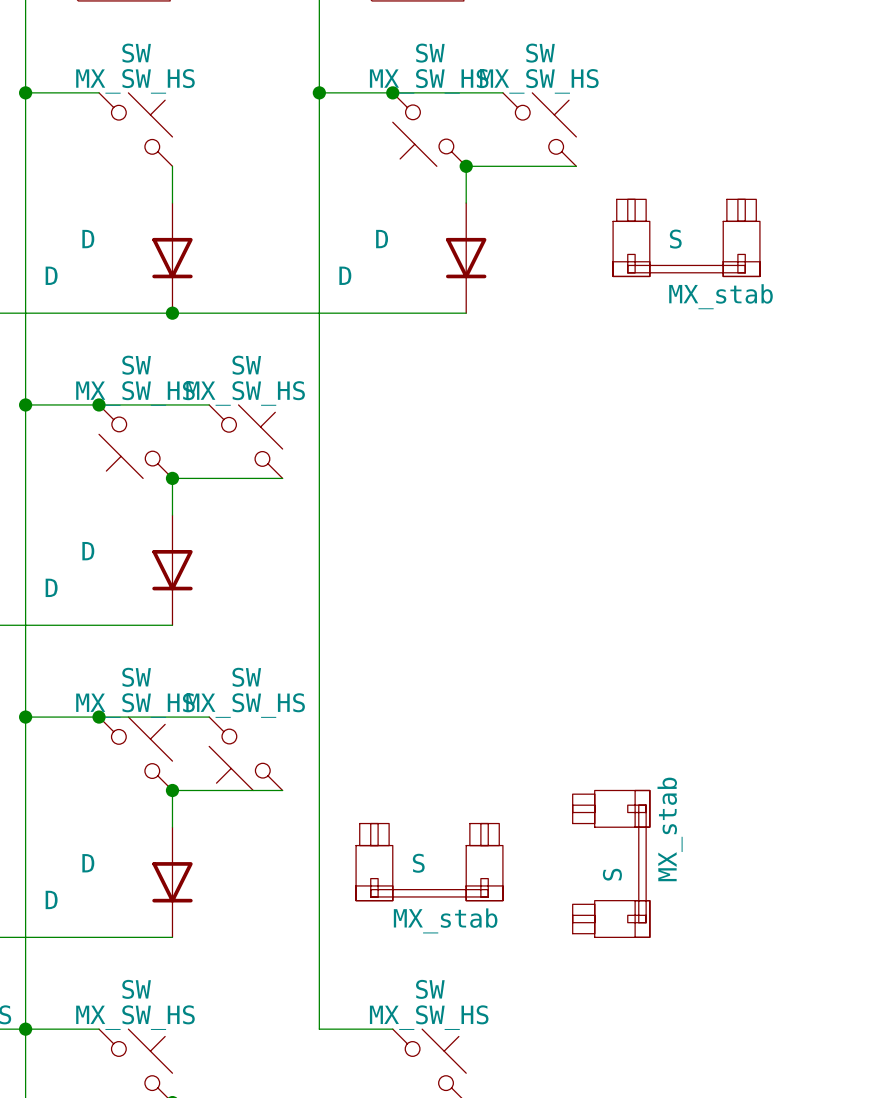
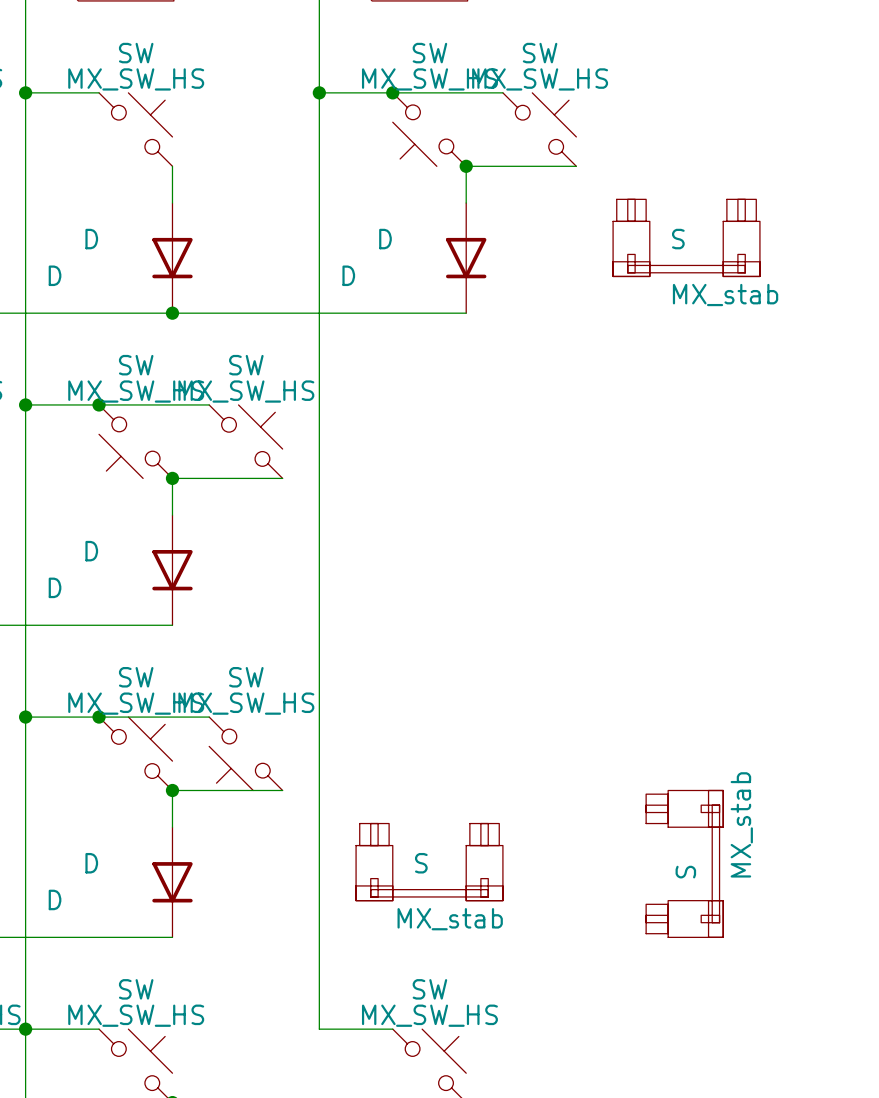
S position: (611, 863) -> (684, 863)

